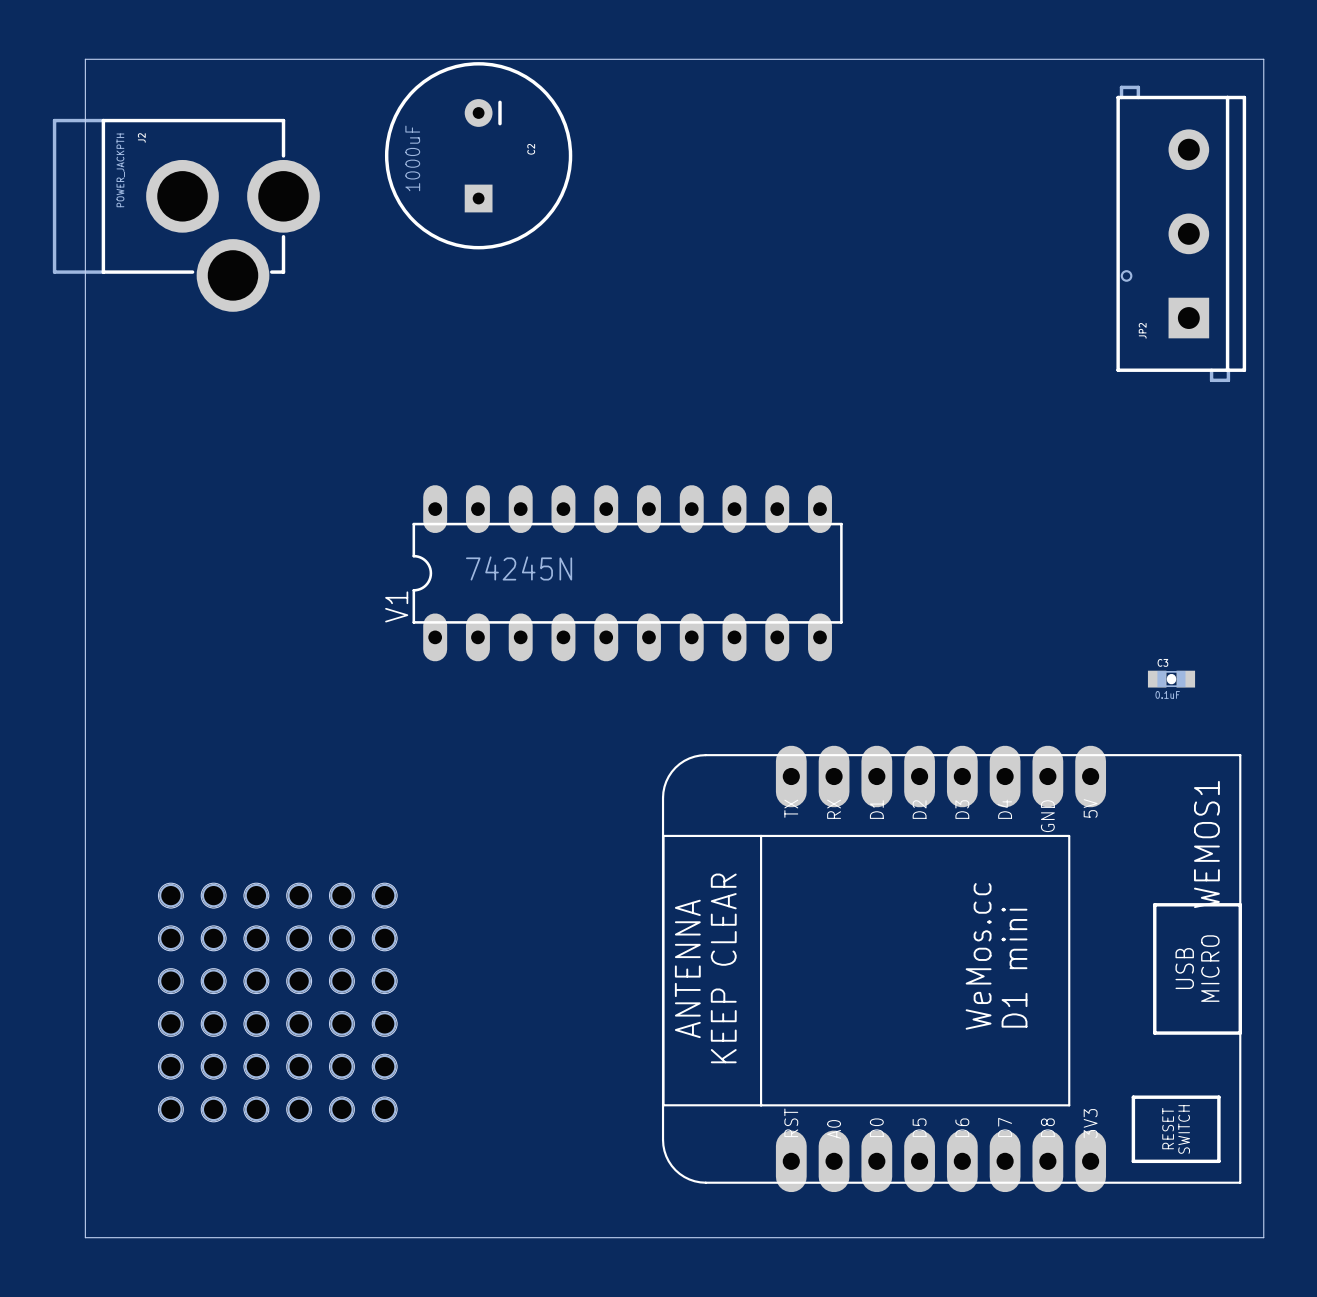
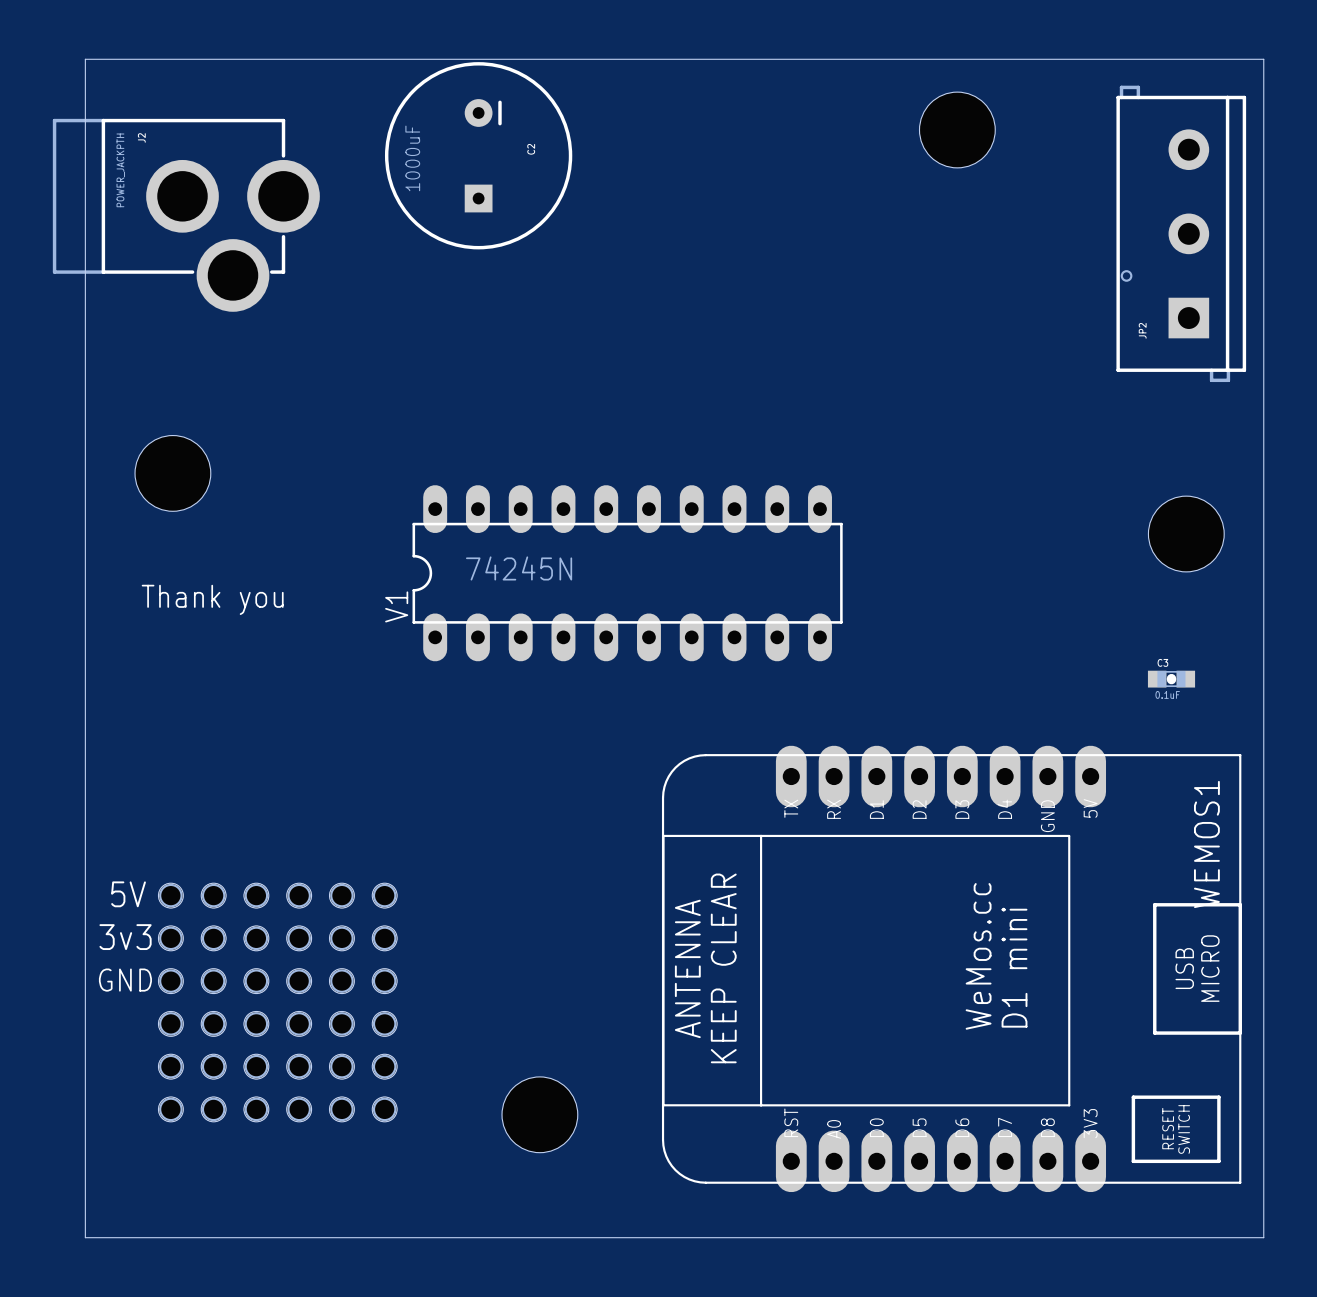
hole: none -> (957, 129)
hole: none -> (172, 473)
hole: none -> (1186, 534)
text: none -> Thank you (212, 599)
text: none -> 5V (128, 894)
text: none -> 3v3 (125, 937)
text: none -> GND (125, 980)
hole: none -> (539, 1114)

